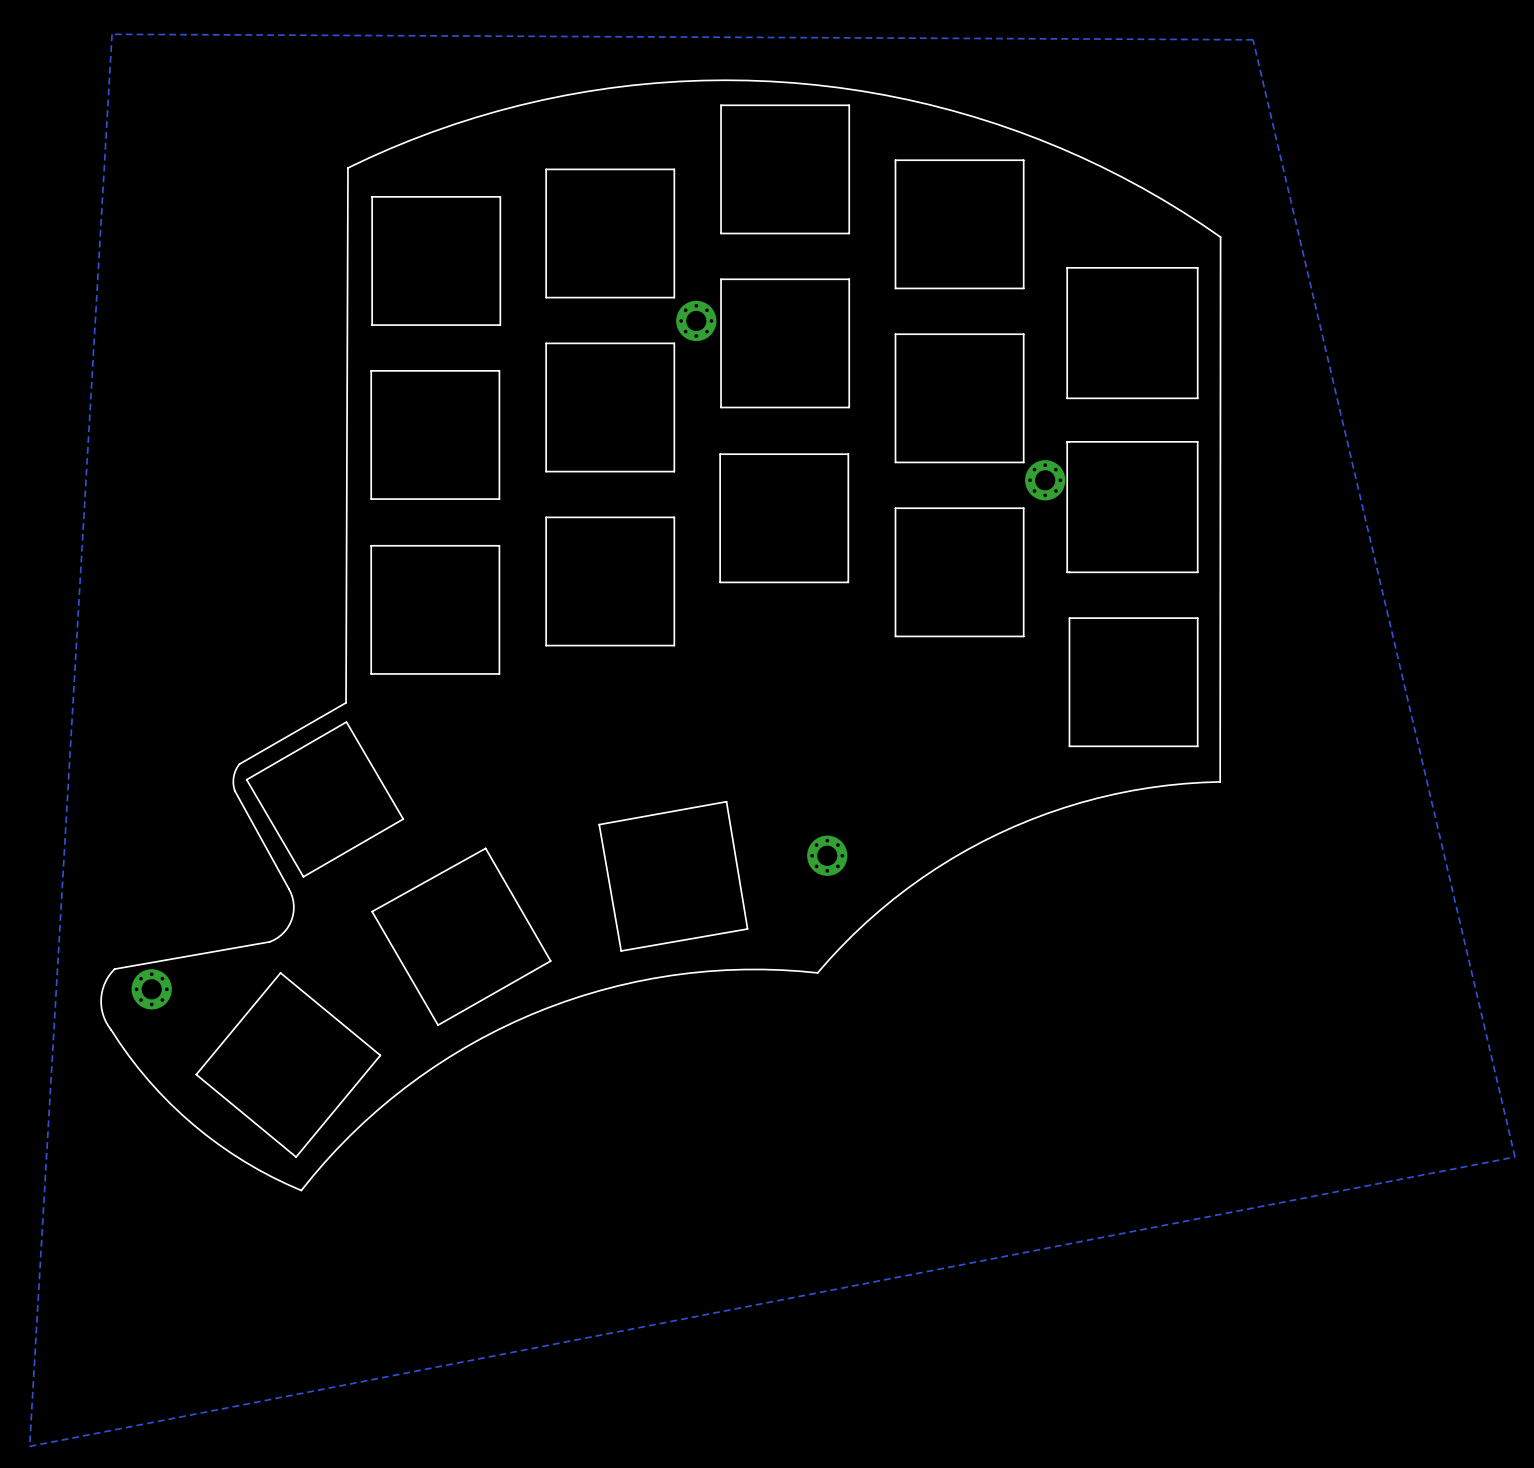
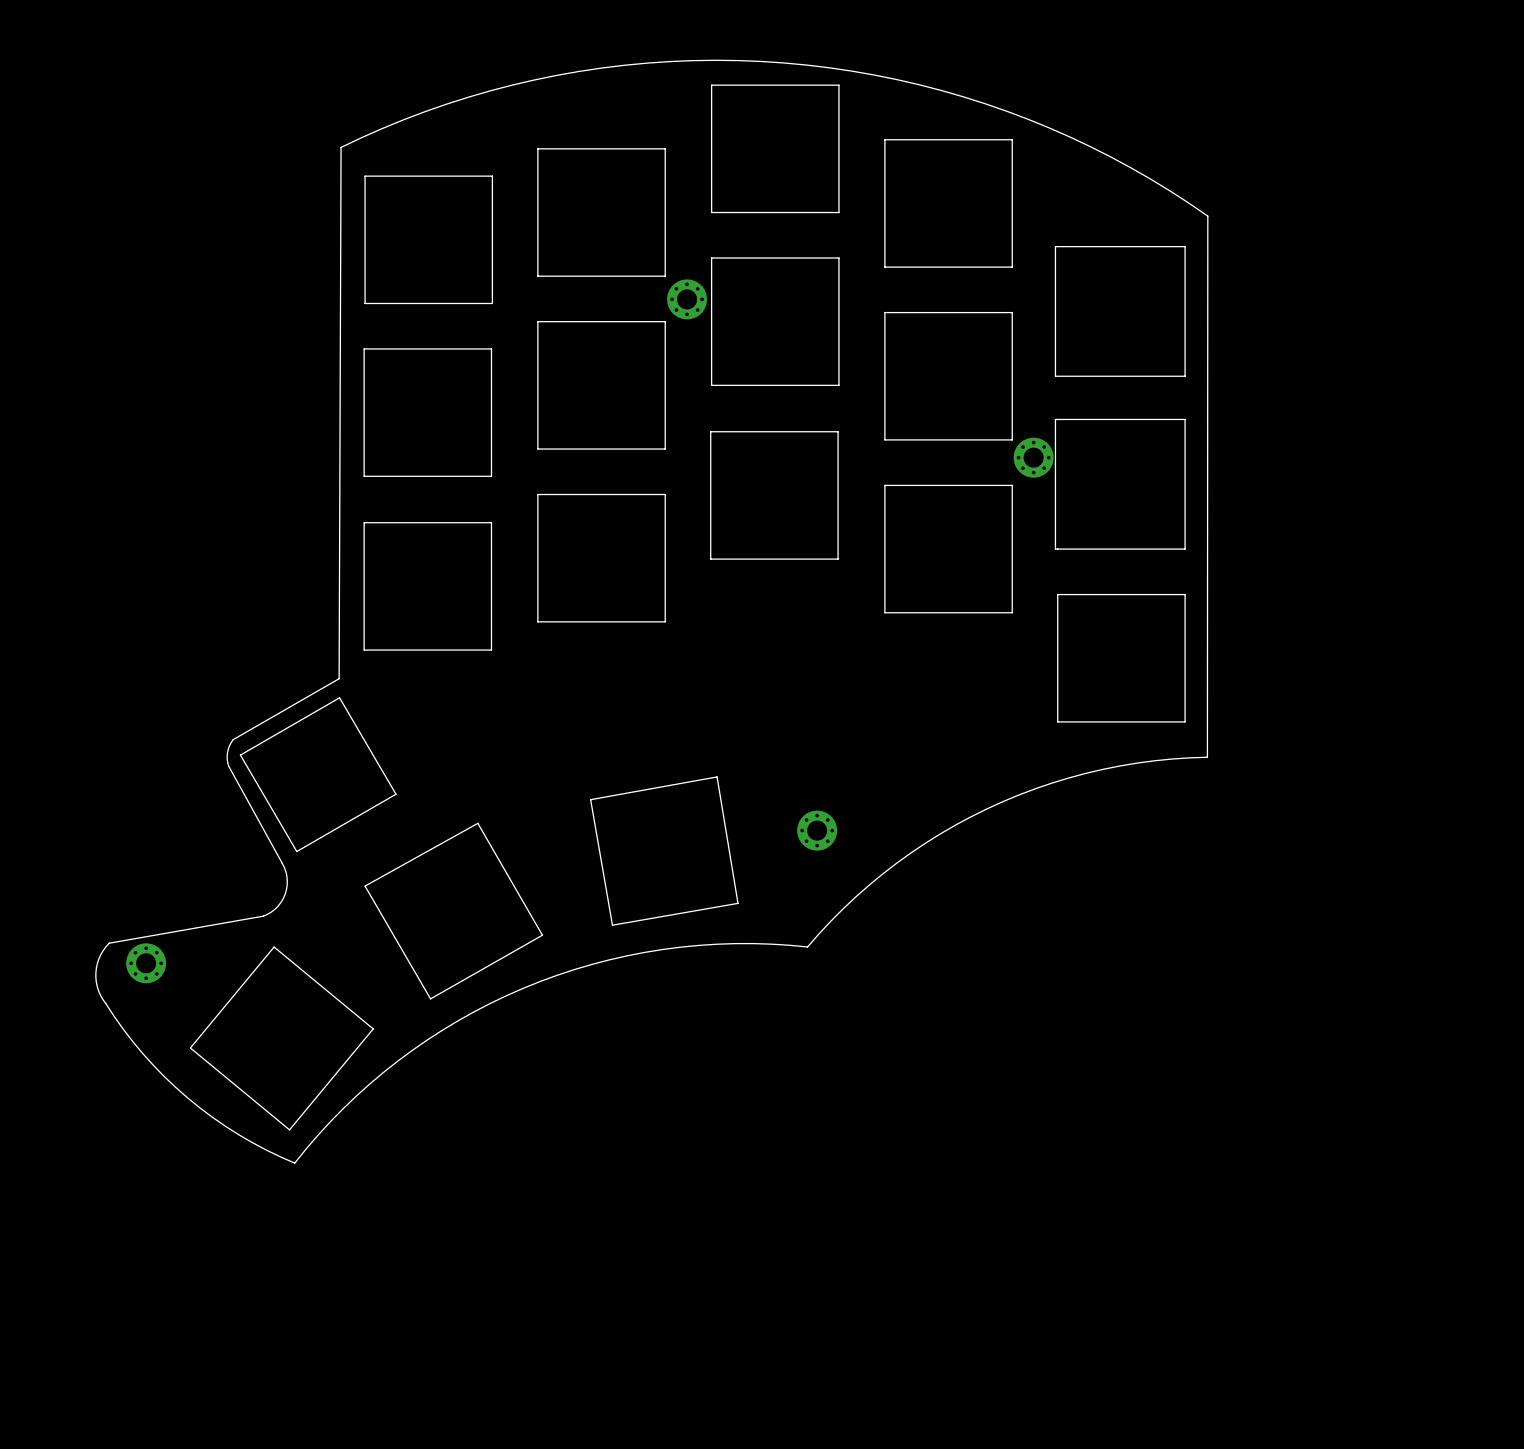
zone outline: (112, 34) (1253, 39) (1514, 1157) (29, 1446) (112, 34) -> none

